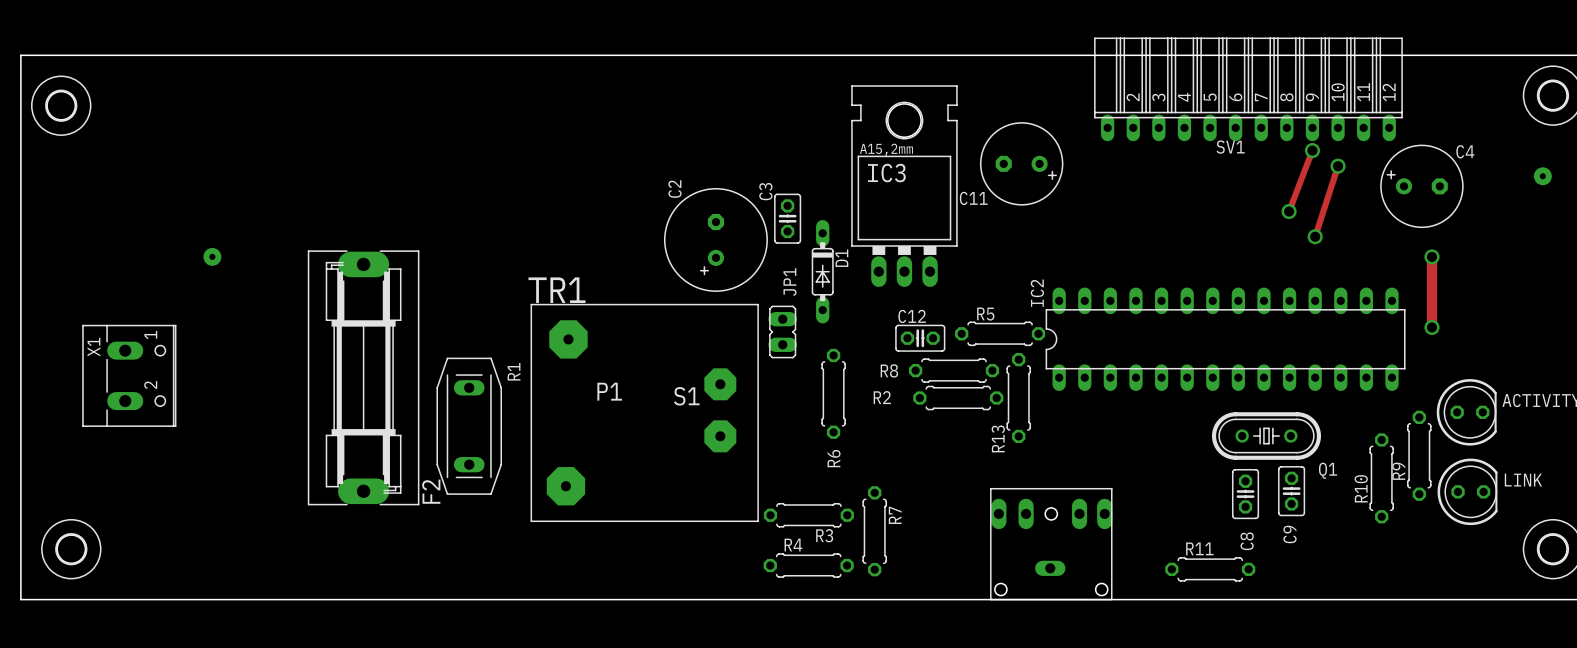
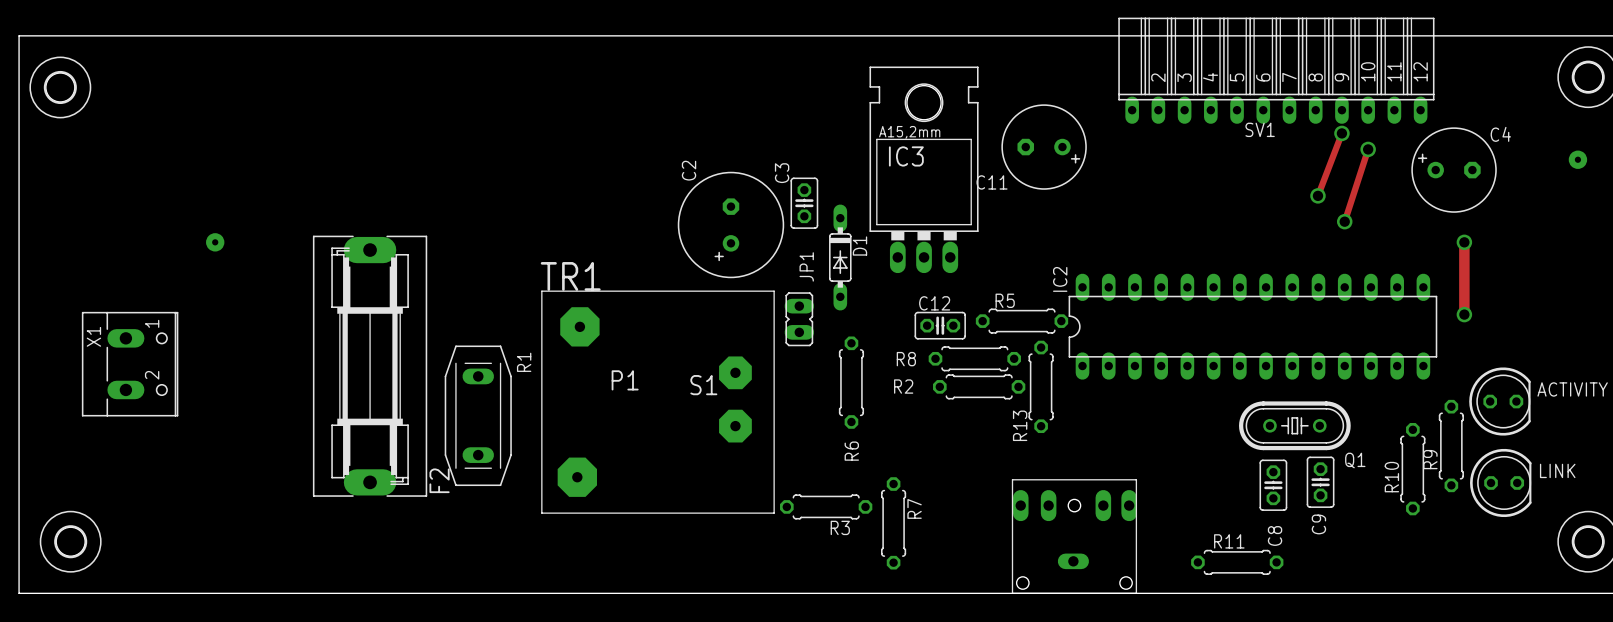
R4: (808, 565) -> none

